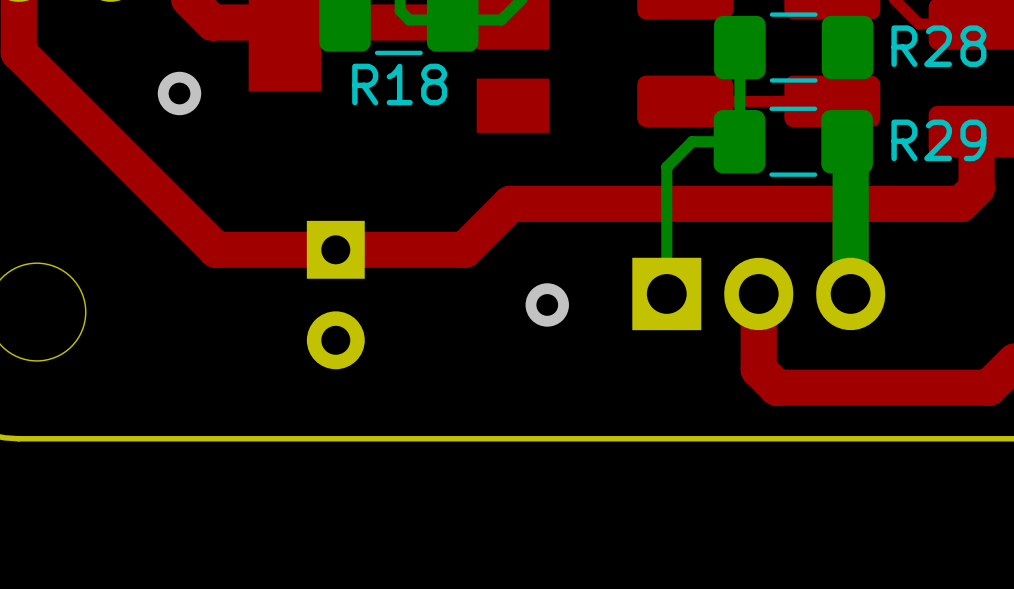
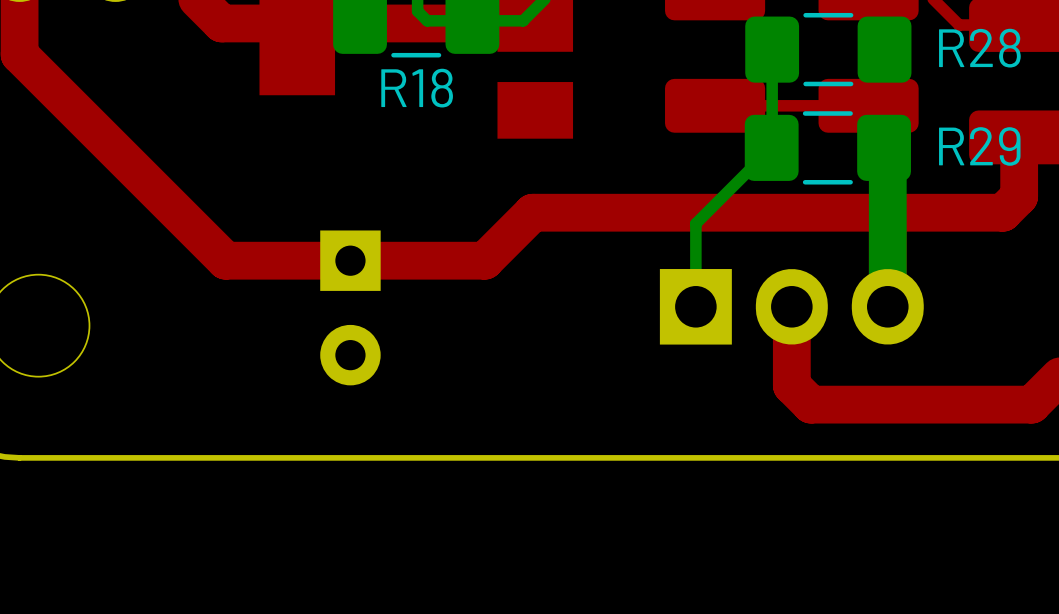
via: (179, 93) -> none
bottom track: (739, 141) (692, 141) (666, 167) (666, 214) -> (771, 147) (695, 223)
via: (547, 304) -> none

